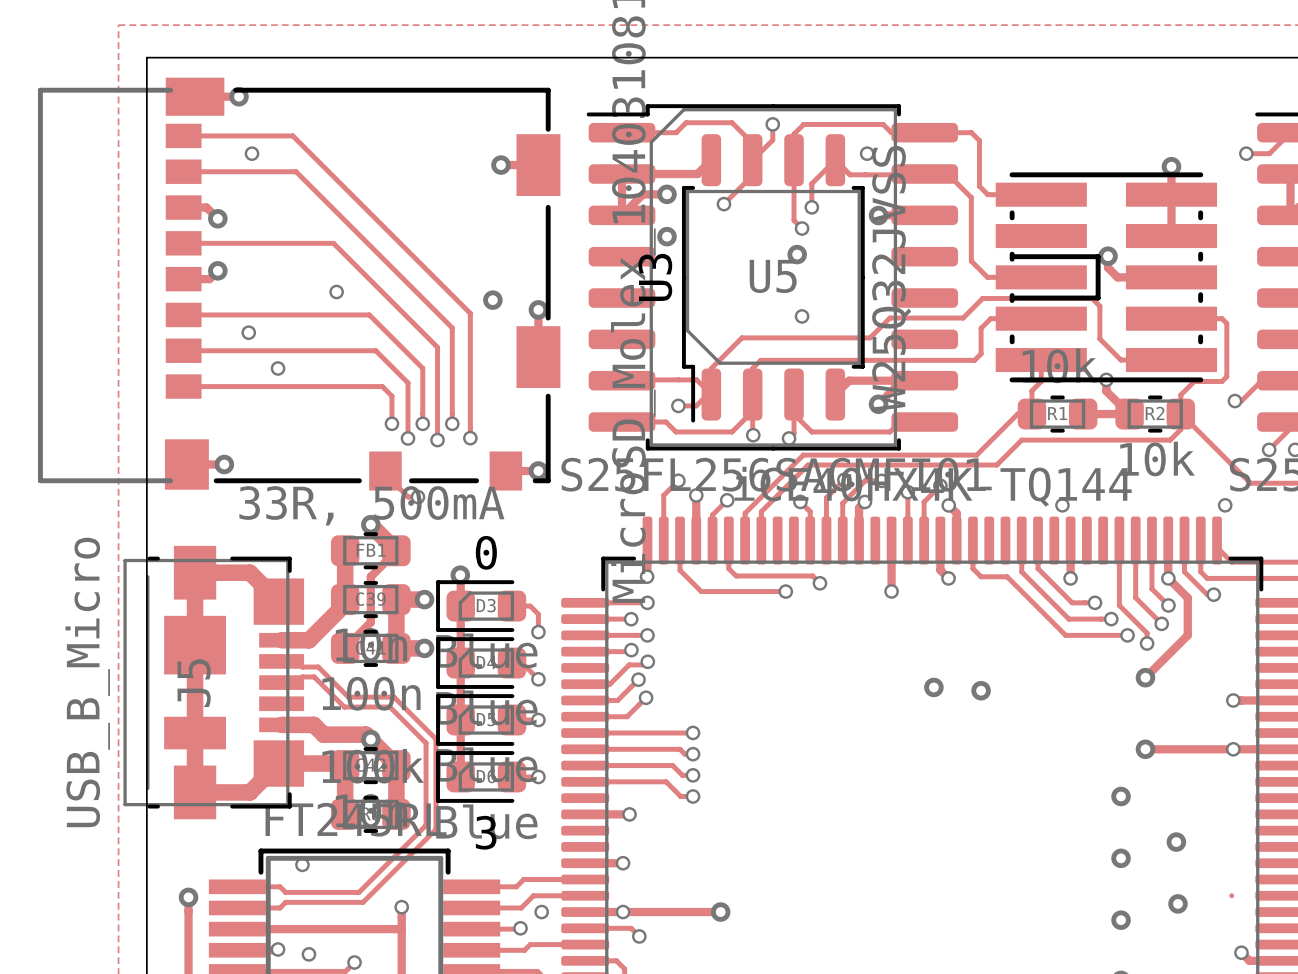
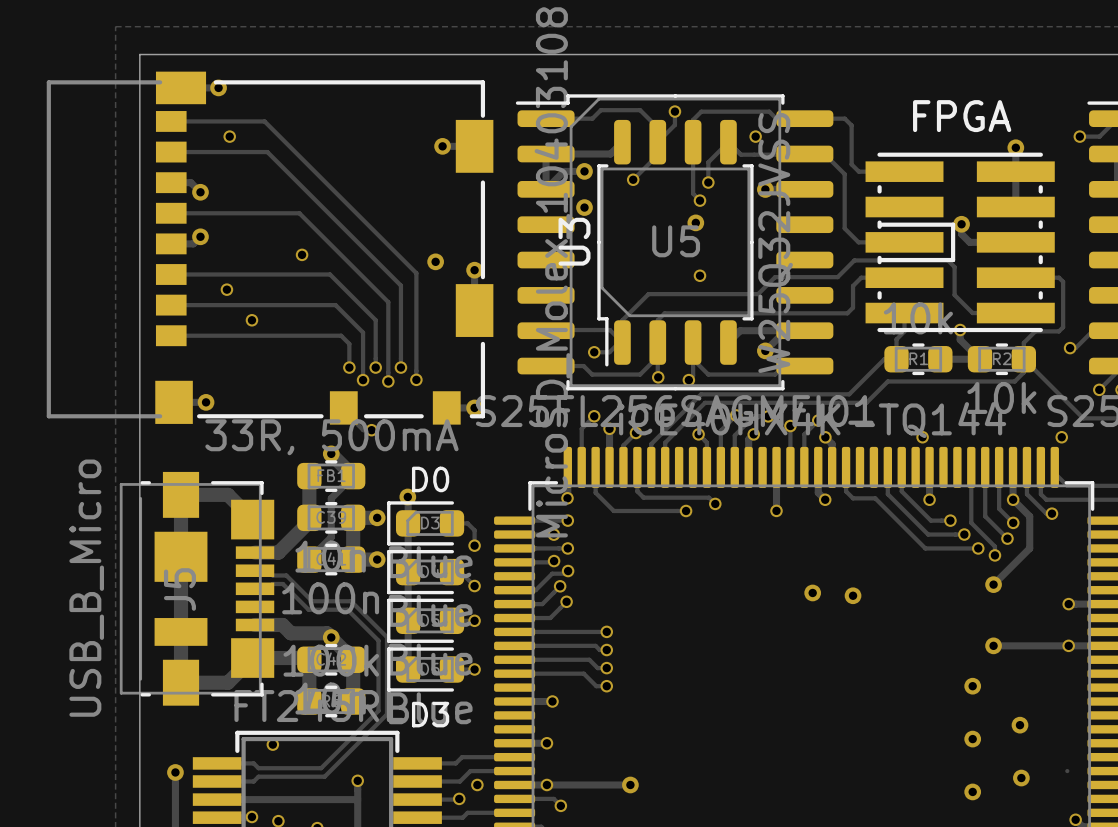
text: none -> FPGA (962, 116)
text: 0 (486, 552) -> D0 (430, 479)
text: 3 (486, 832) -> D3 (430, 714)

